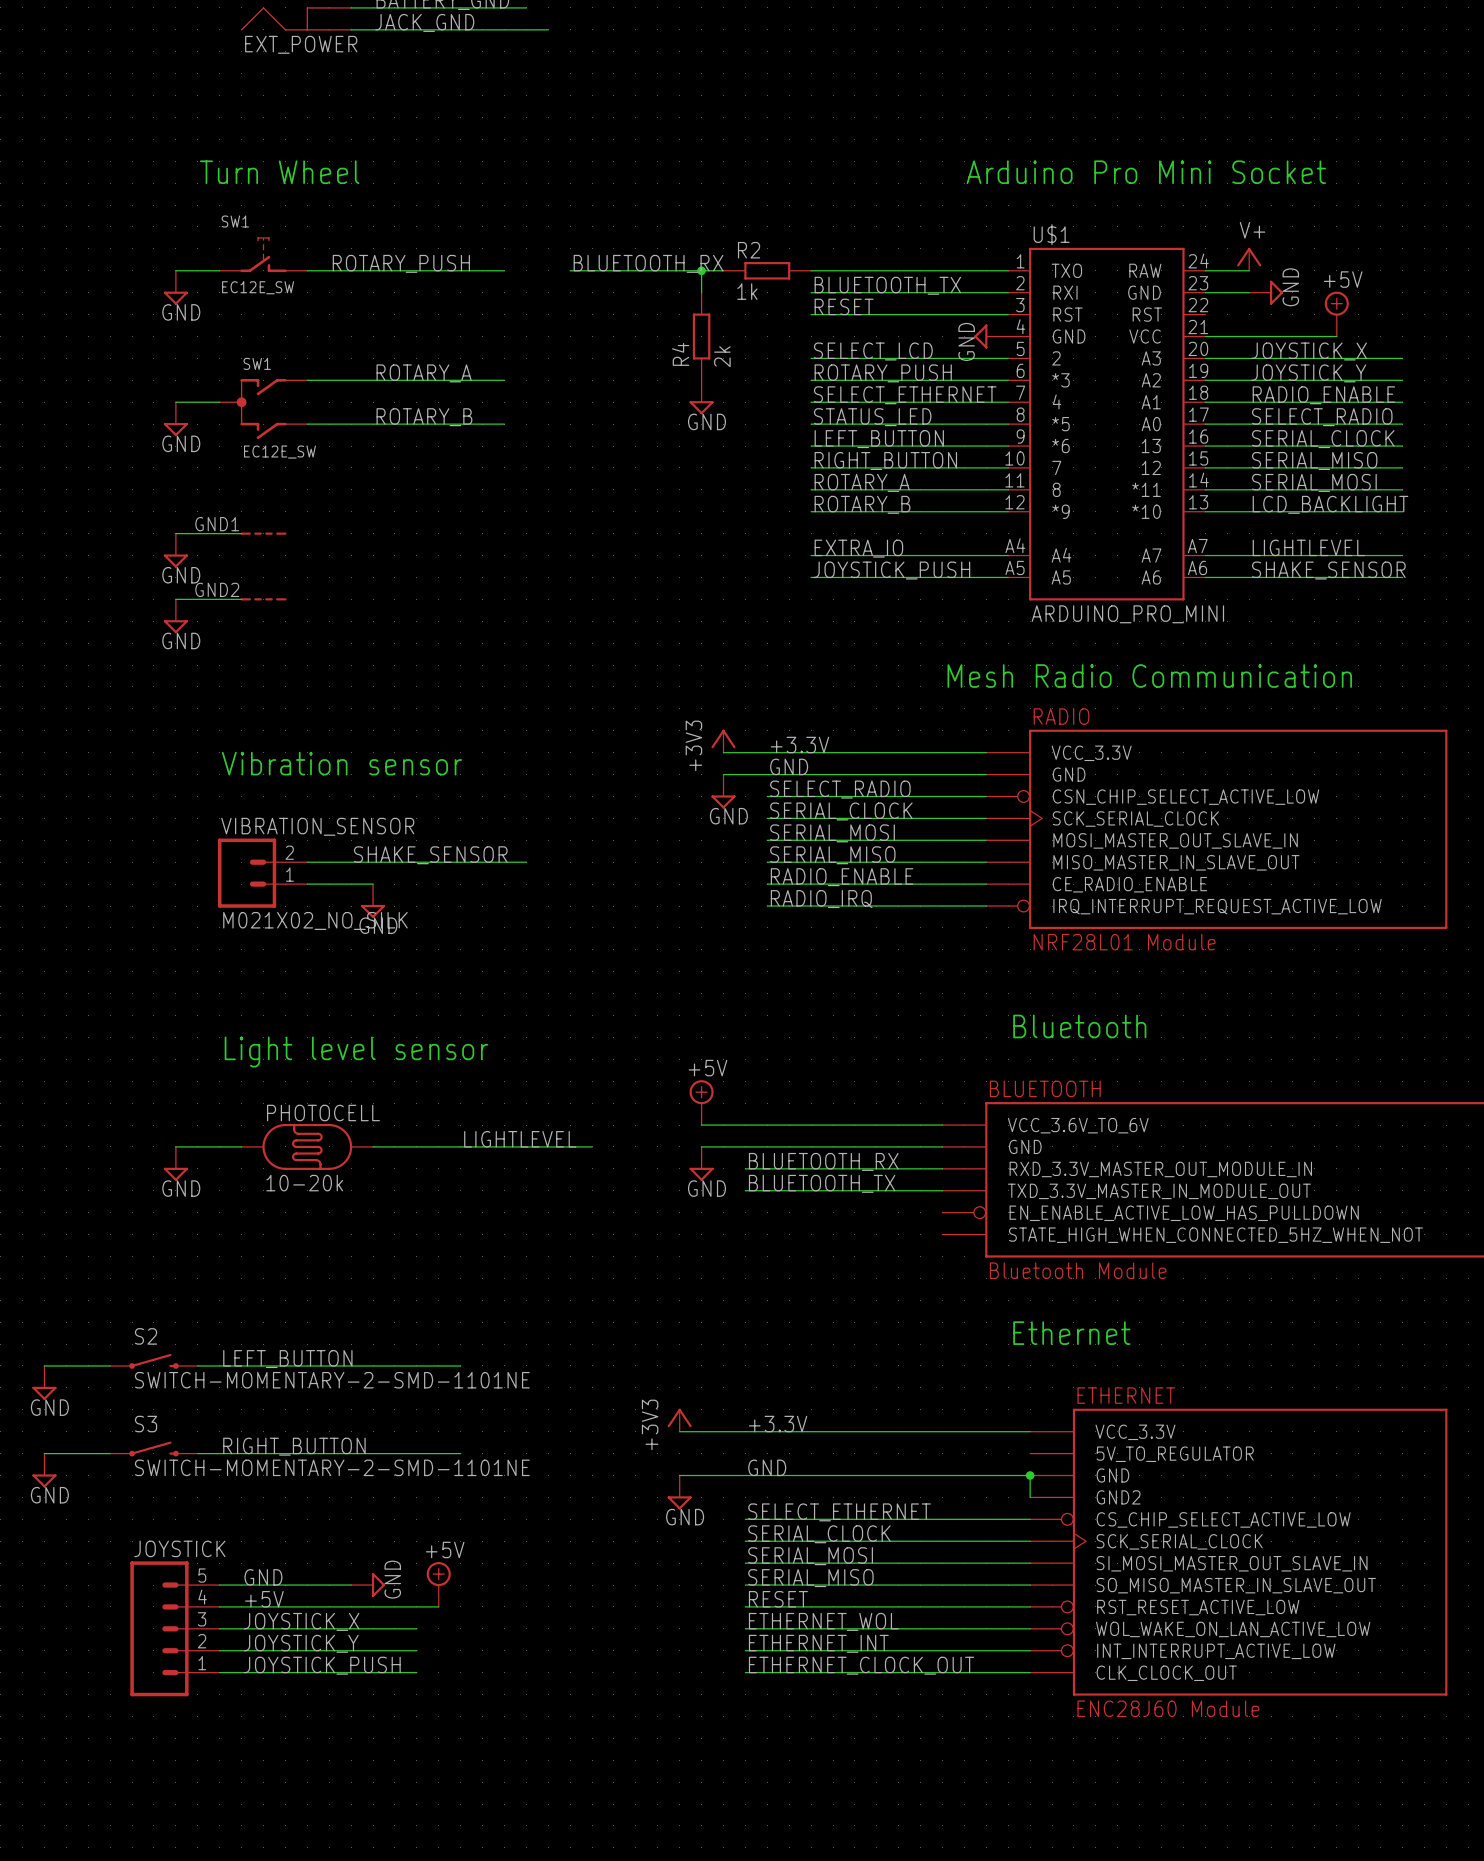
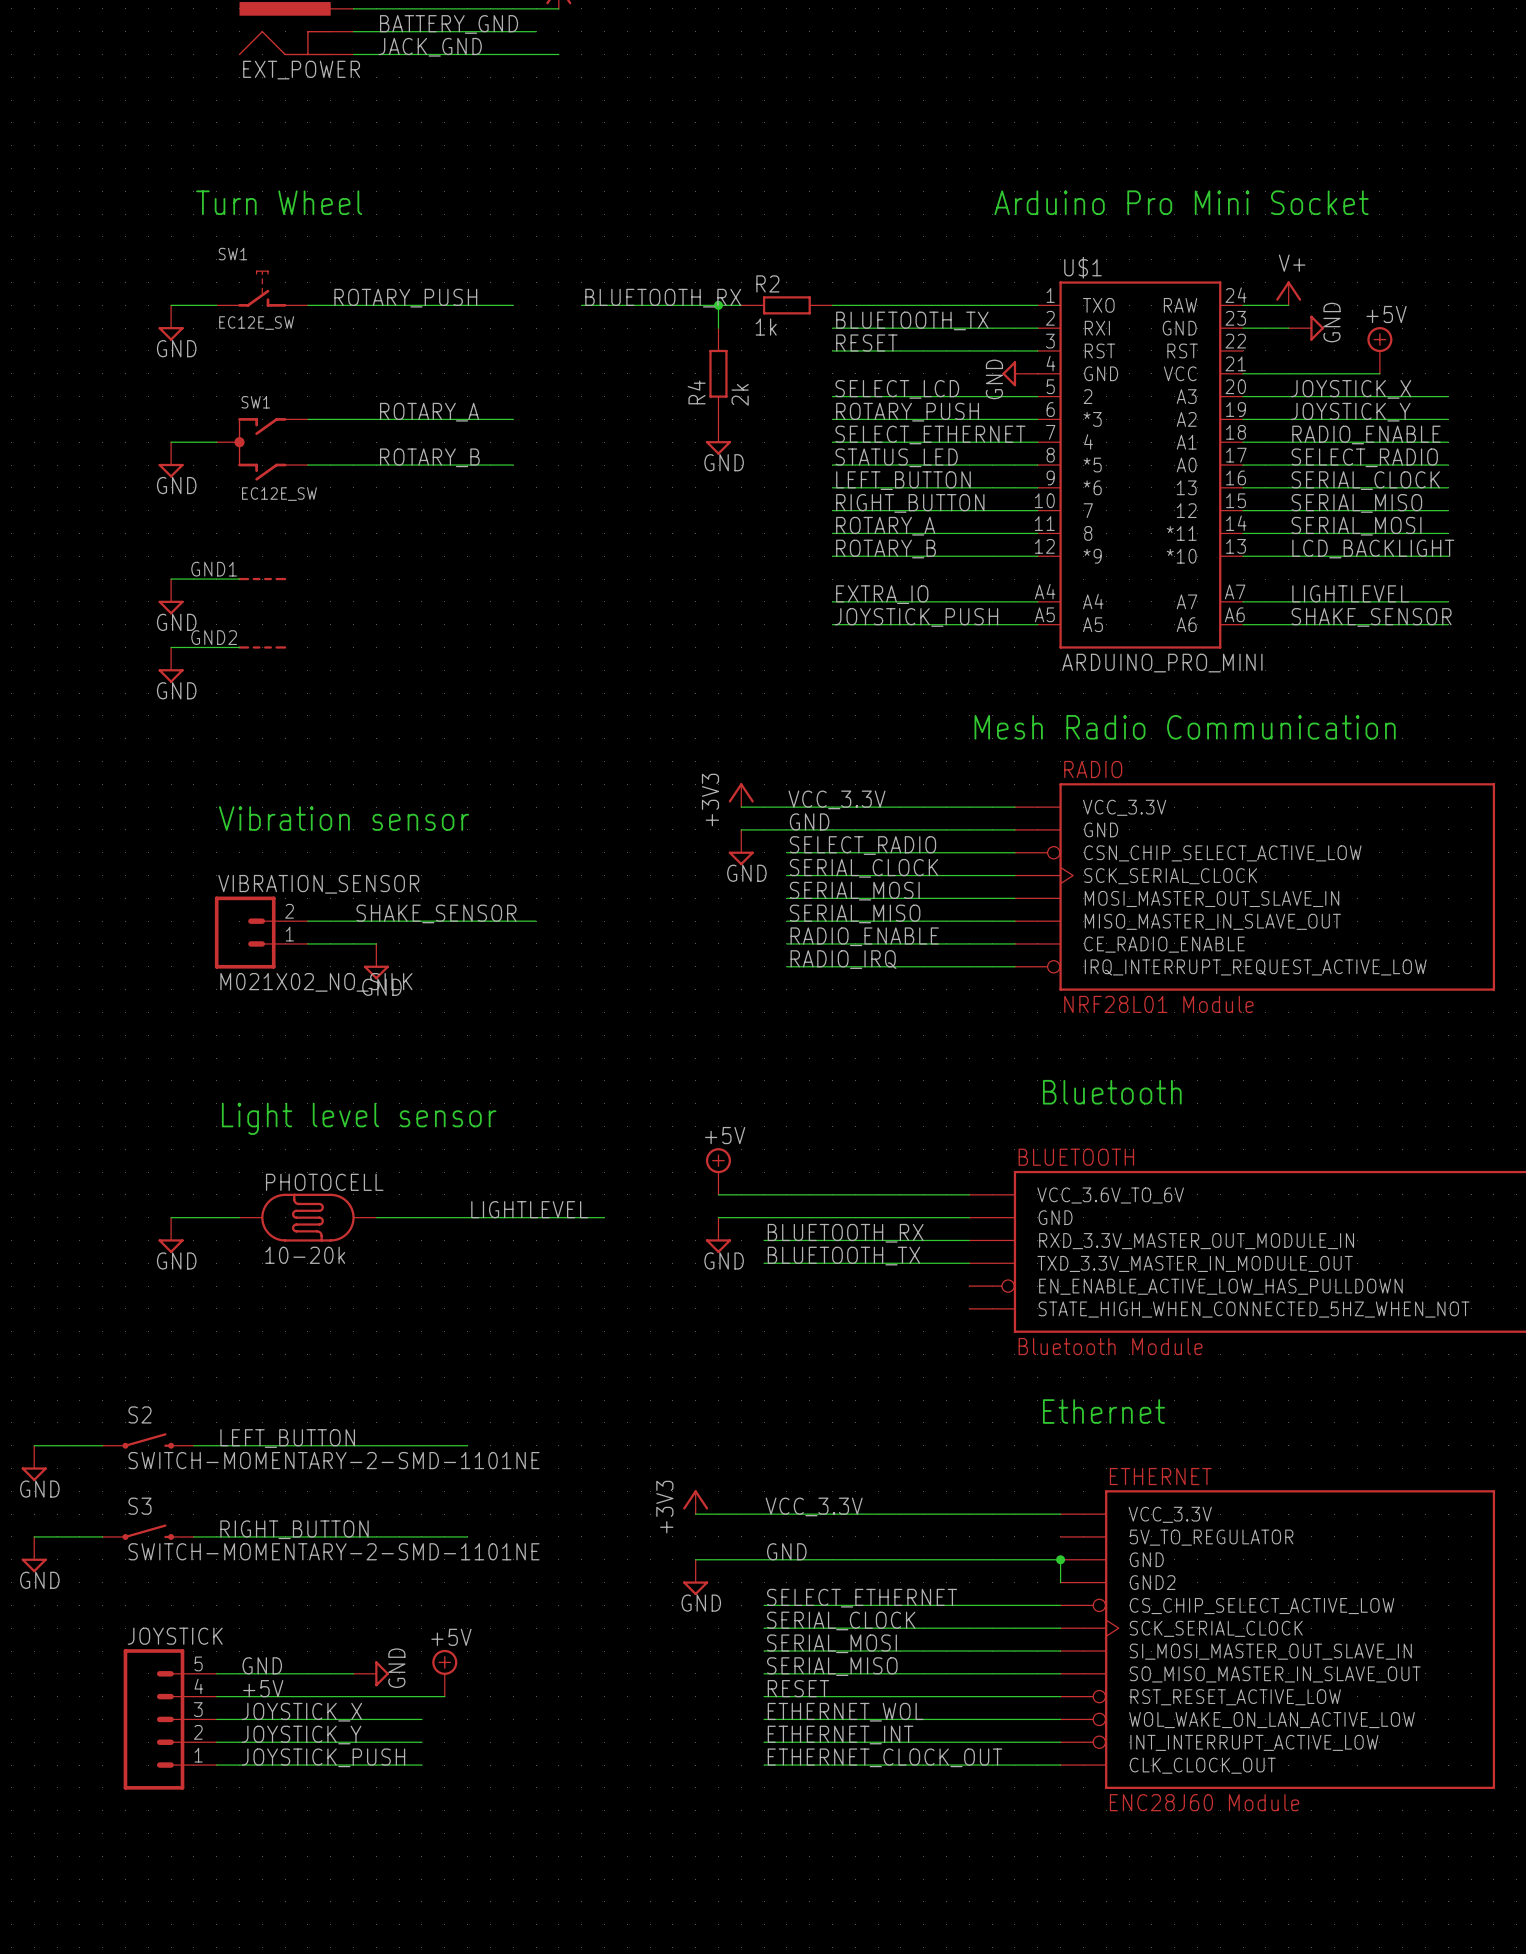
label: +3.3V (799, 745) -> VCC_3.3V (836, 799)
label: +3.3V (778, 1424) -> VCC_3.3V (814, 1506)

